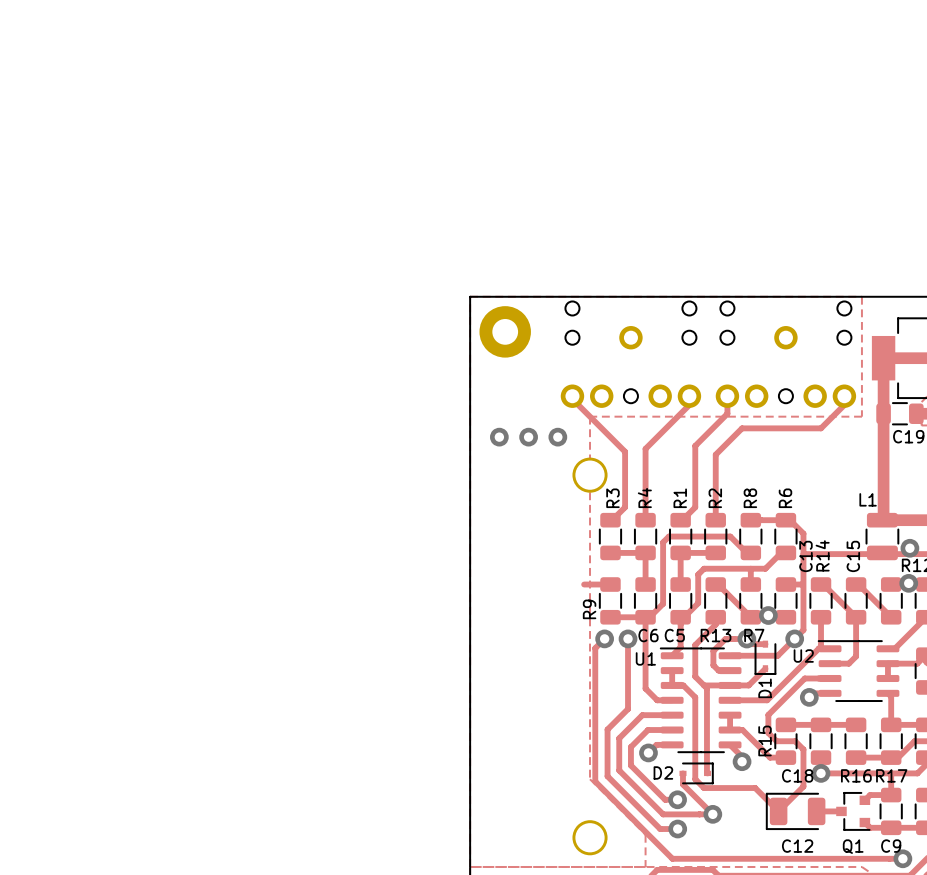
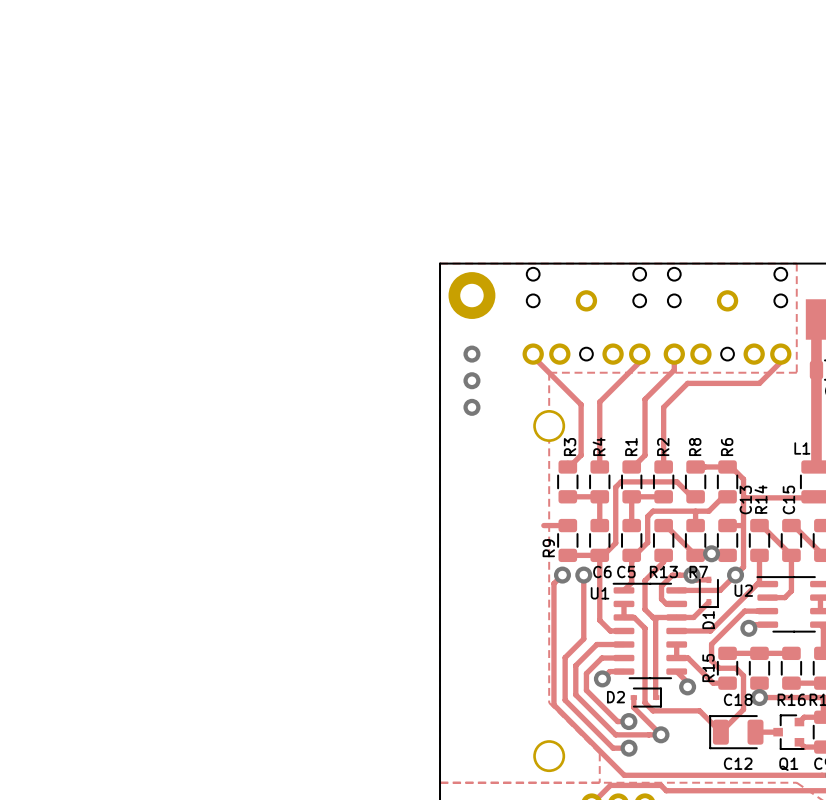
via: none -> (471, 354)
via: none -> (471, 380)
via: (499, 437) -> none
via: (528, 437) -> none
via: (557, 437) -> none
via: none -> (471, 407)

